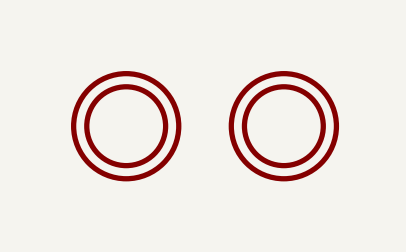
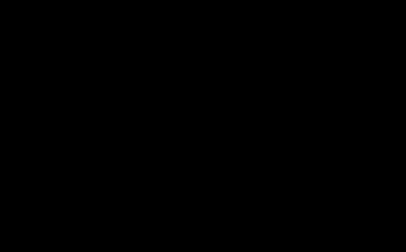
part: (126, 126) -> none
part: (283, 126) -> none

